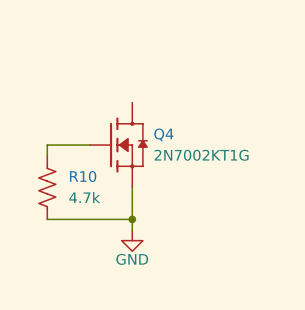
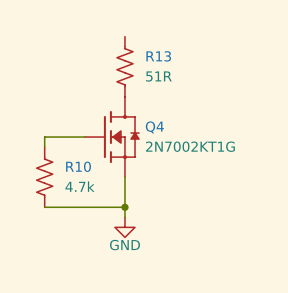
R13: none -> 51R (124, 66)

